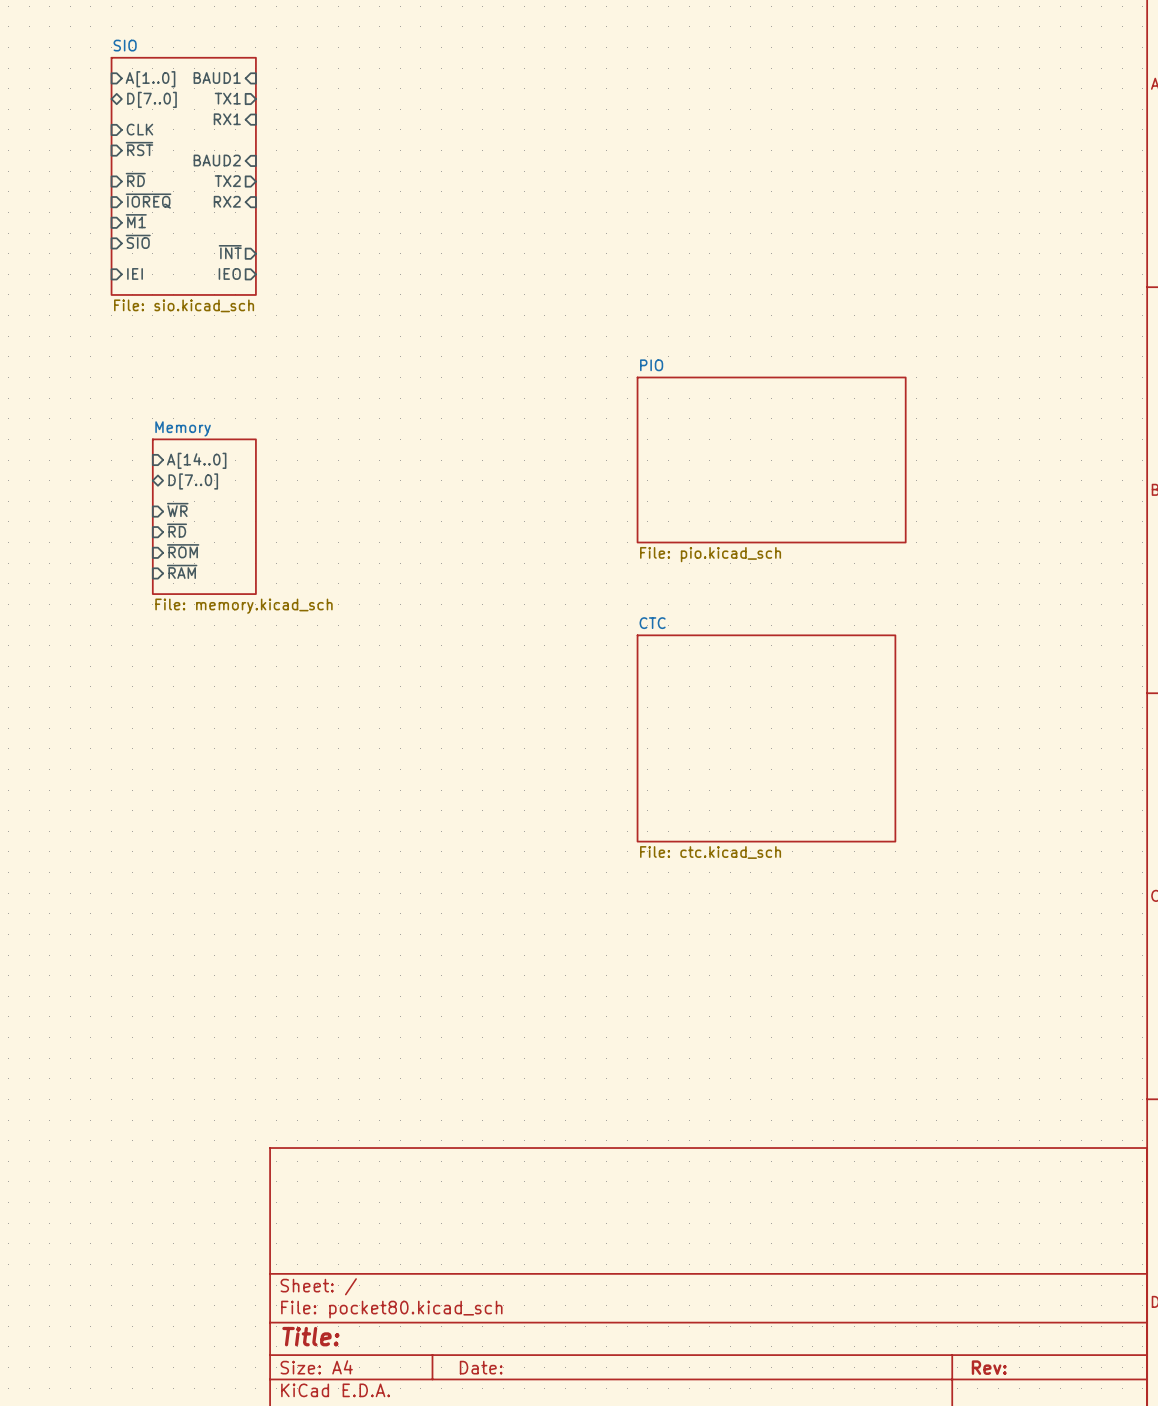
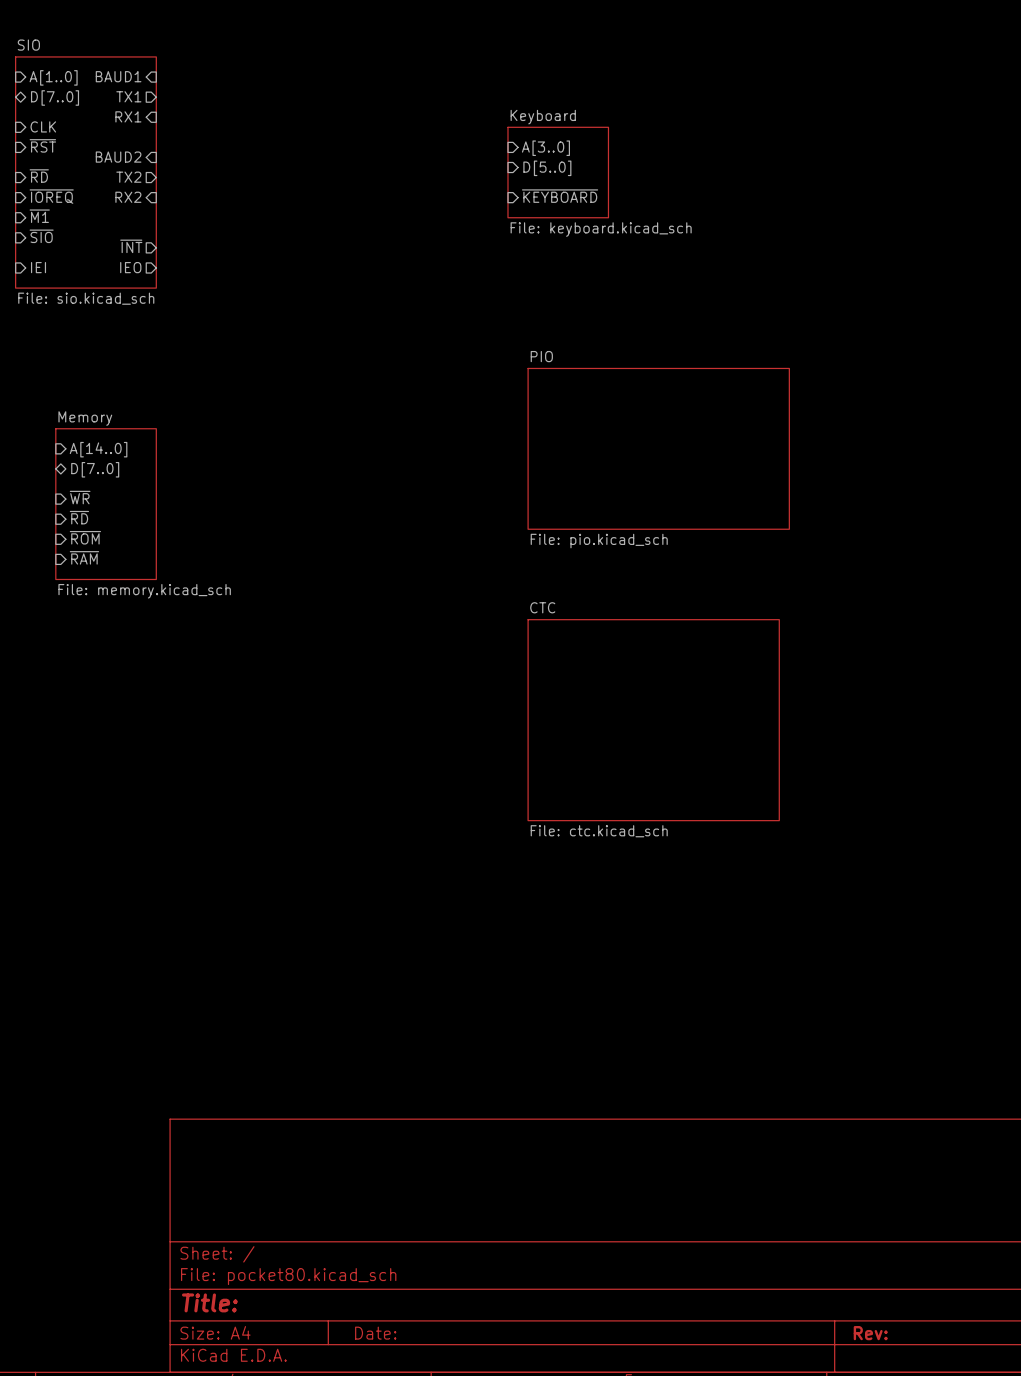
sheet pin: none -> A[3..0] (545, 148)
sheet pin: none -> D[5..0] (547, 168)
sheet Keyboard: none -> File: keyboard.kicad_sch (558, 172)
sheet pin: none -> ~{KEYBOARD} (560, 196)

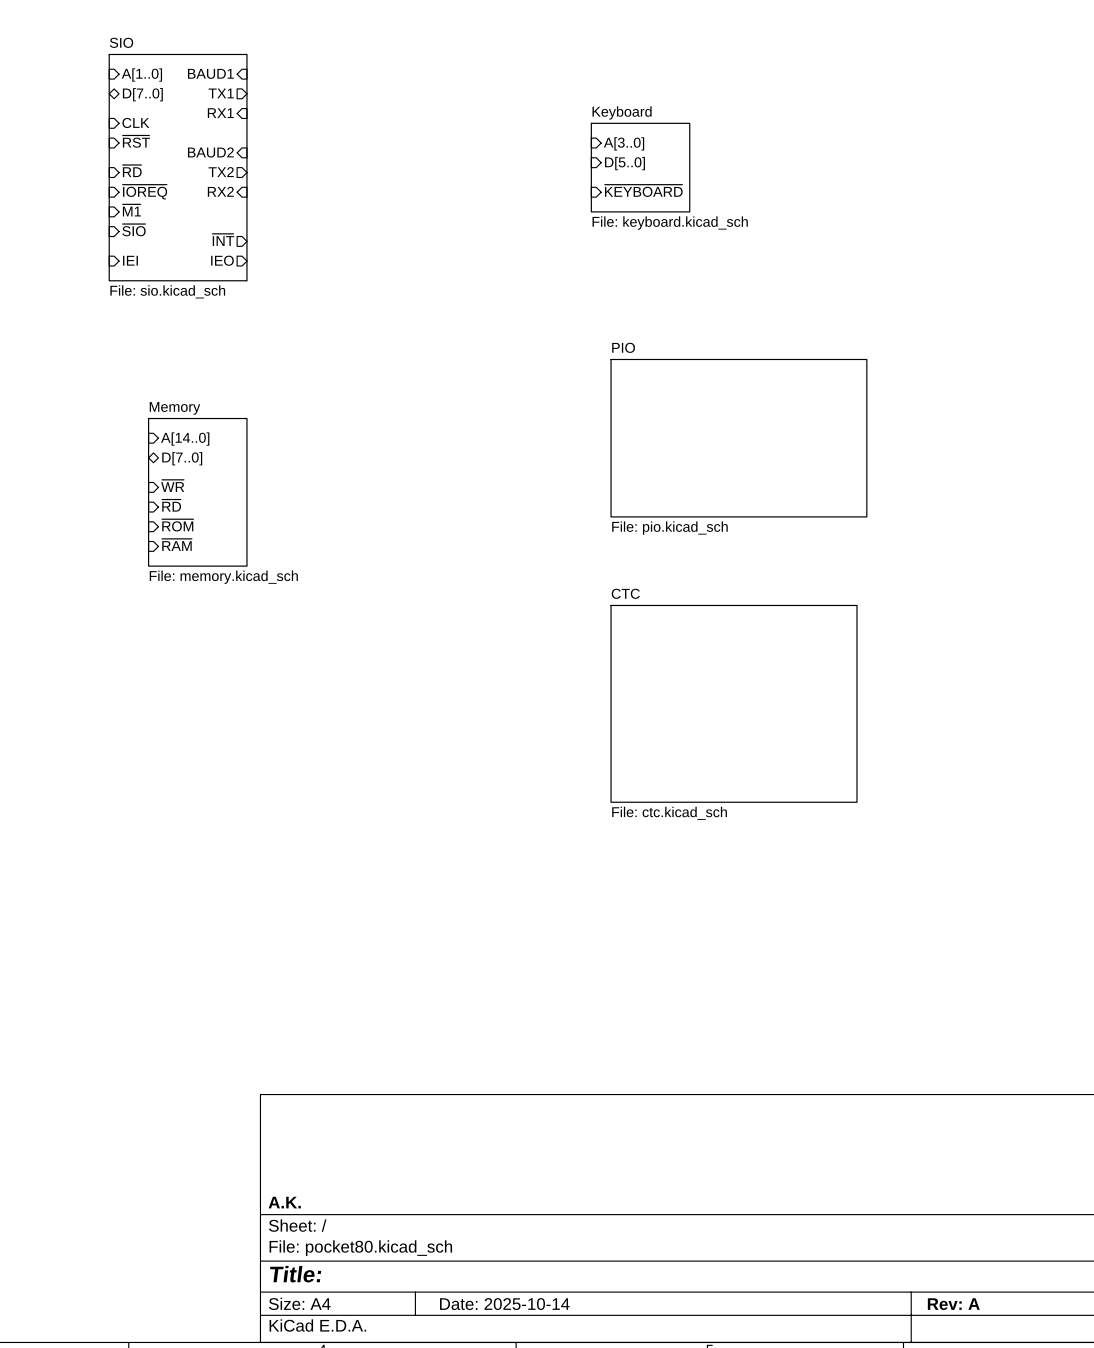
title block: none -> A.K. (284, 1202)
title block: Date: (375, 1333) -> Date: 2025-10-14 (504, 1304)
title block: Rev: (870, 1333) -> Rev: A (953, 1304)

